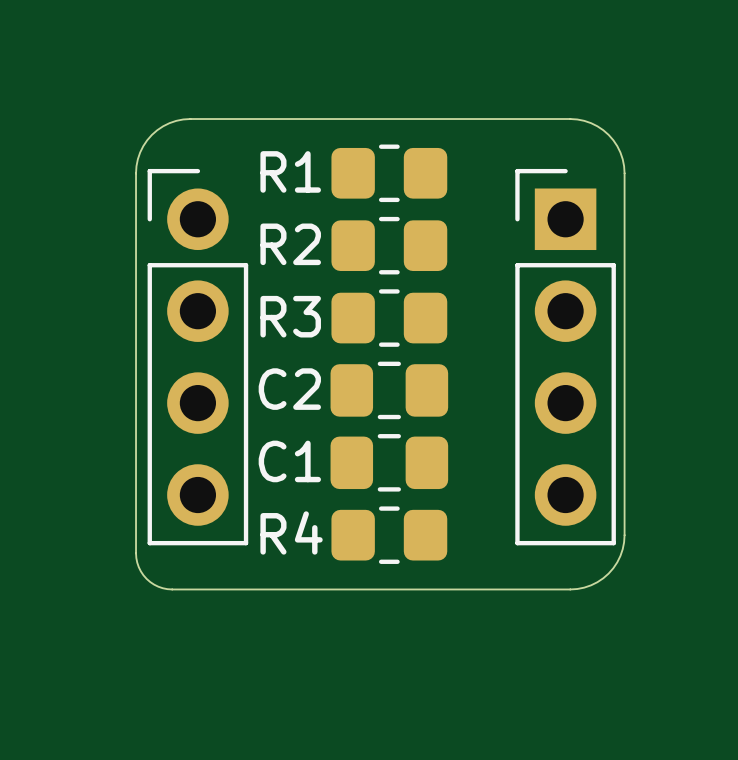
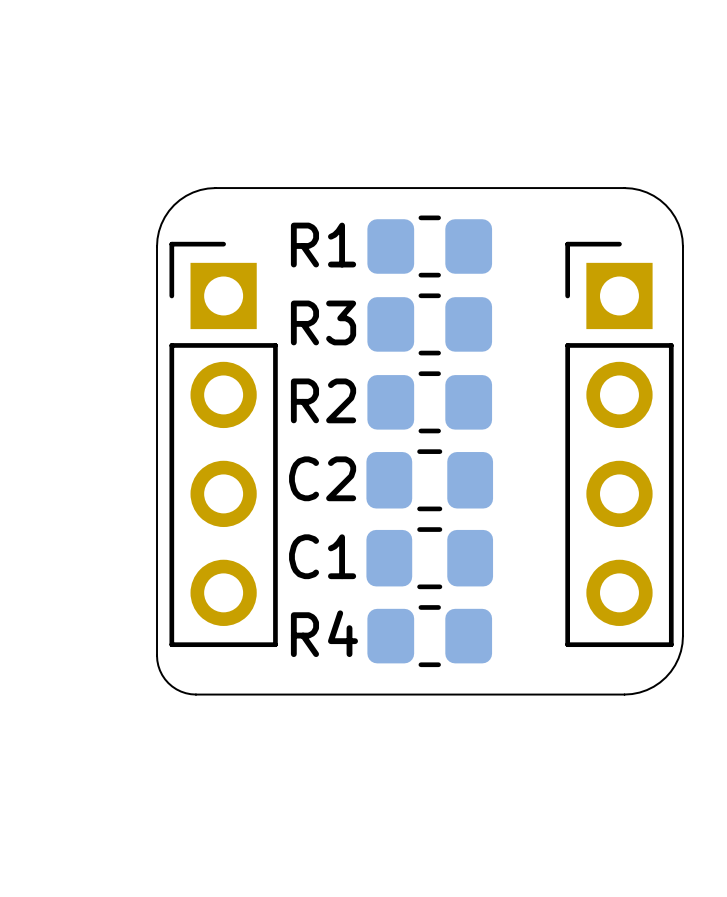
part footprint: [147, 168, 249, 546] -> [169, 241, 278, 648]
R2 name: R2 (290, 244) -> R3 (323, 322)
R3 name: R3 (290, 316) -> R2 (323, 400)

